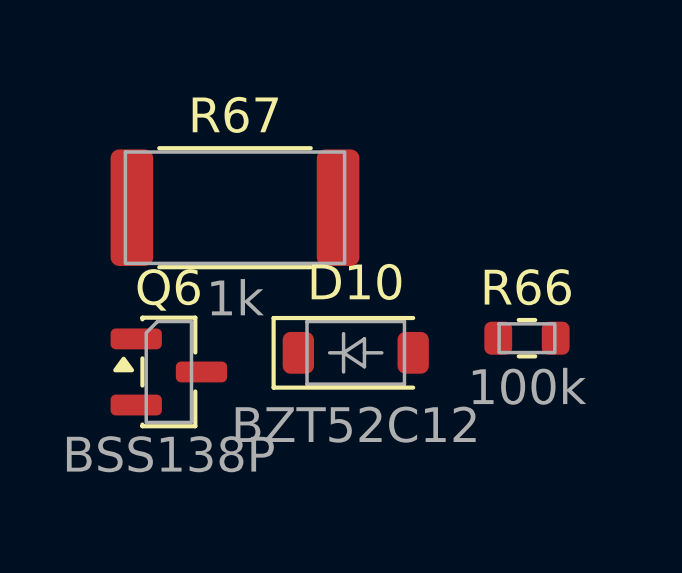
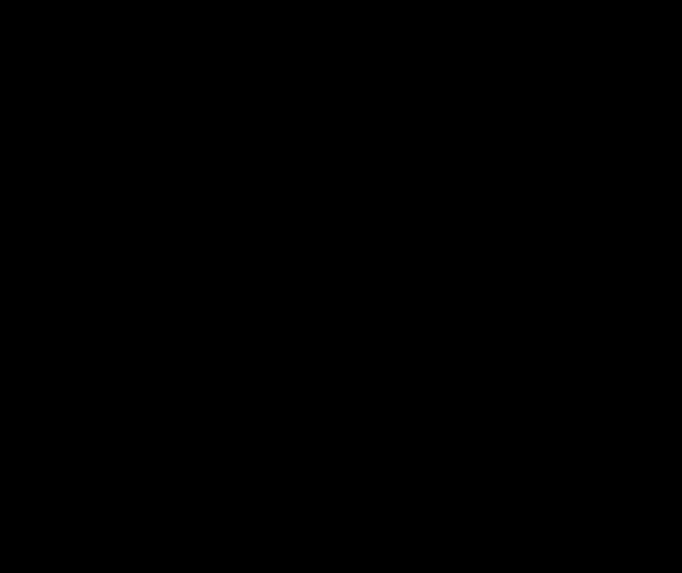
R67: 1k (234, 207) -> none
R66: 100k (526, 338) -> none
D10: BZT52C12 (350, 352) -> none
Q6: BSS138P (168, 371) -> none

